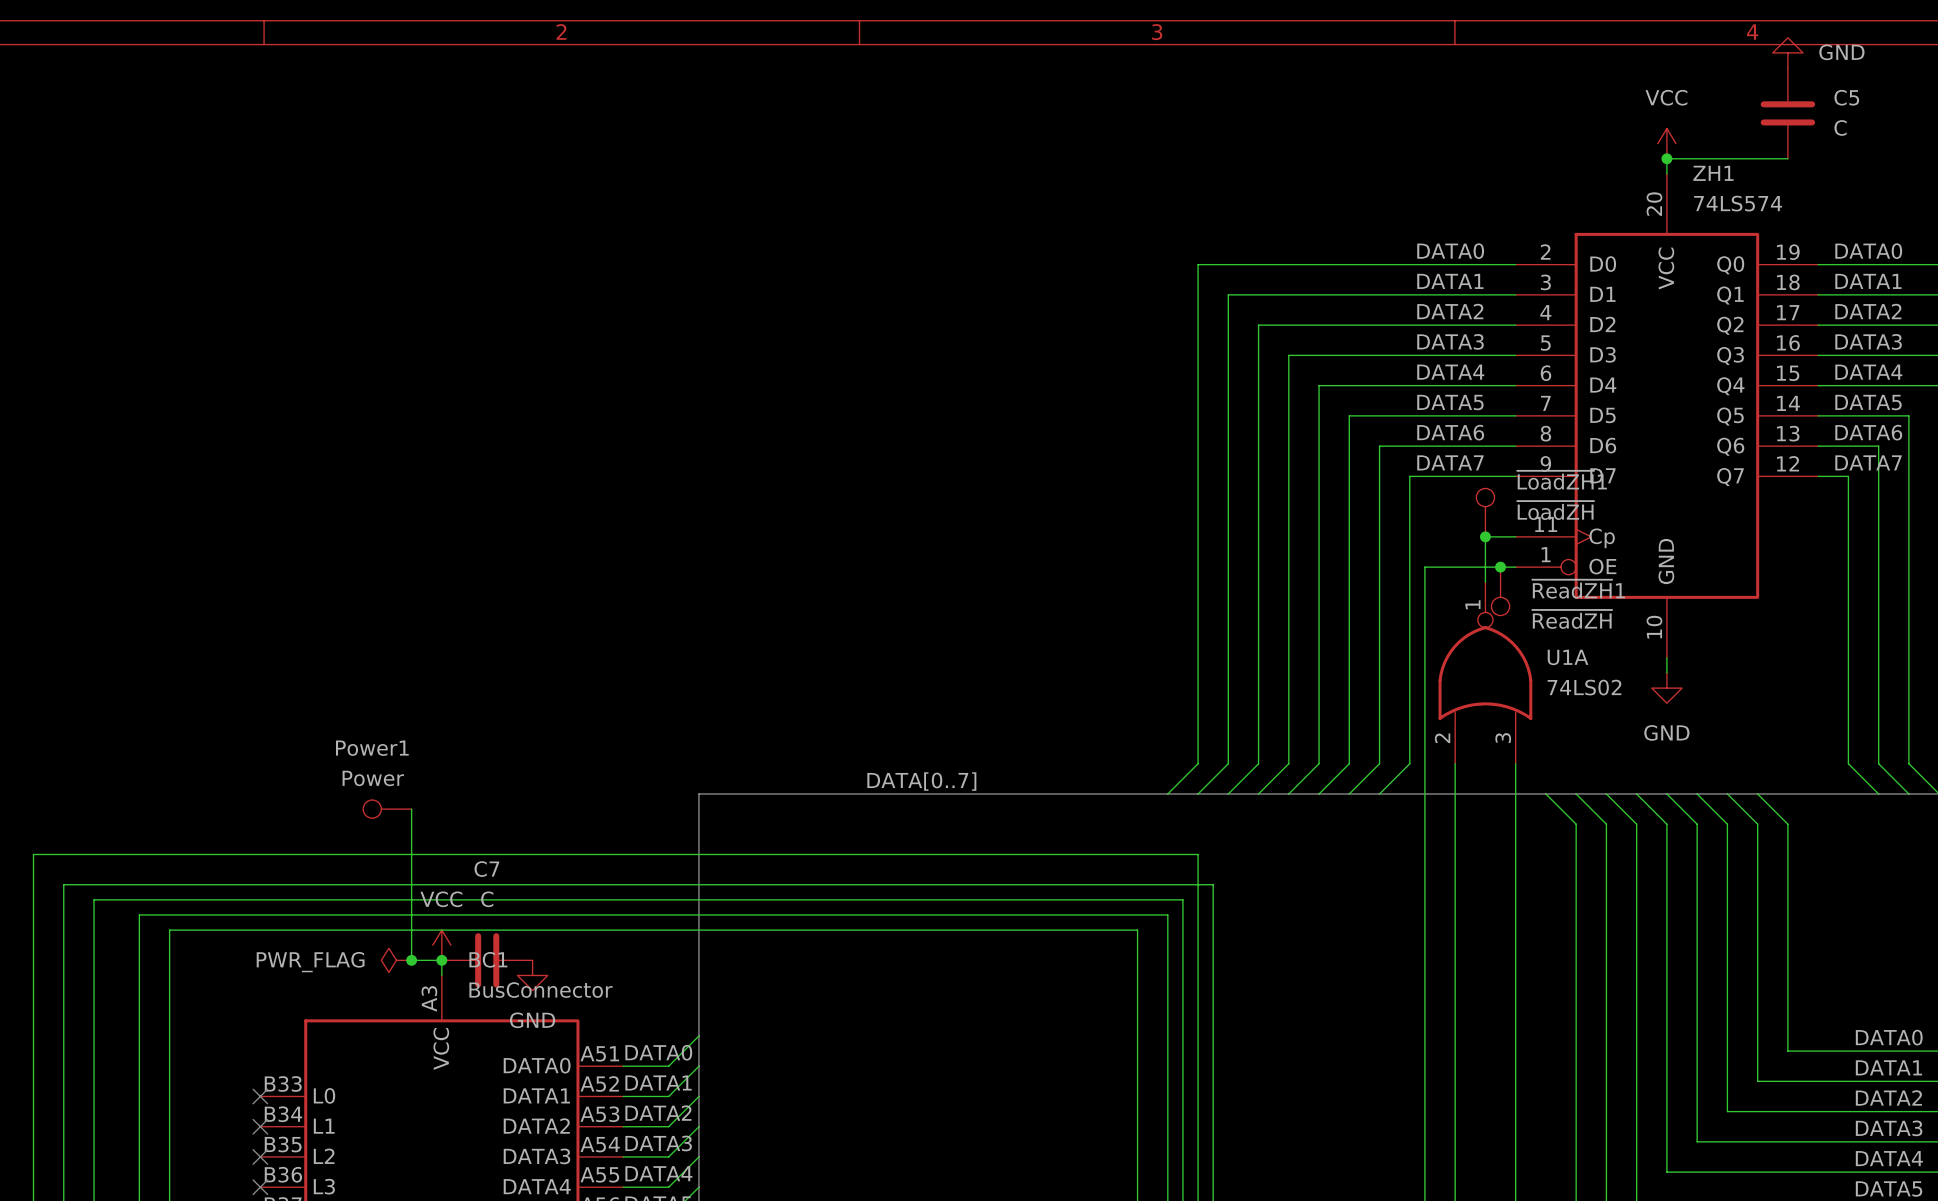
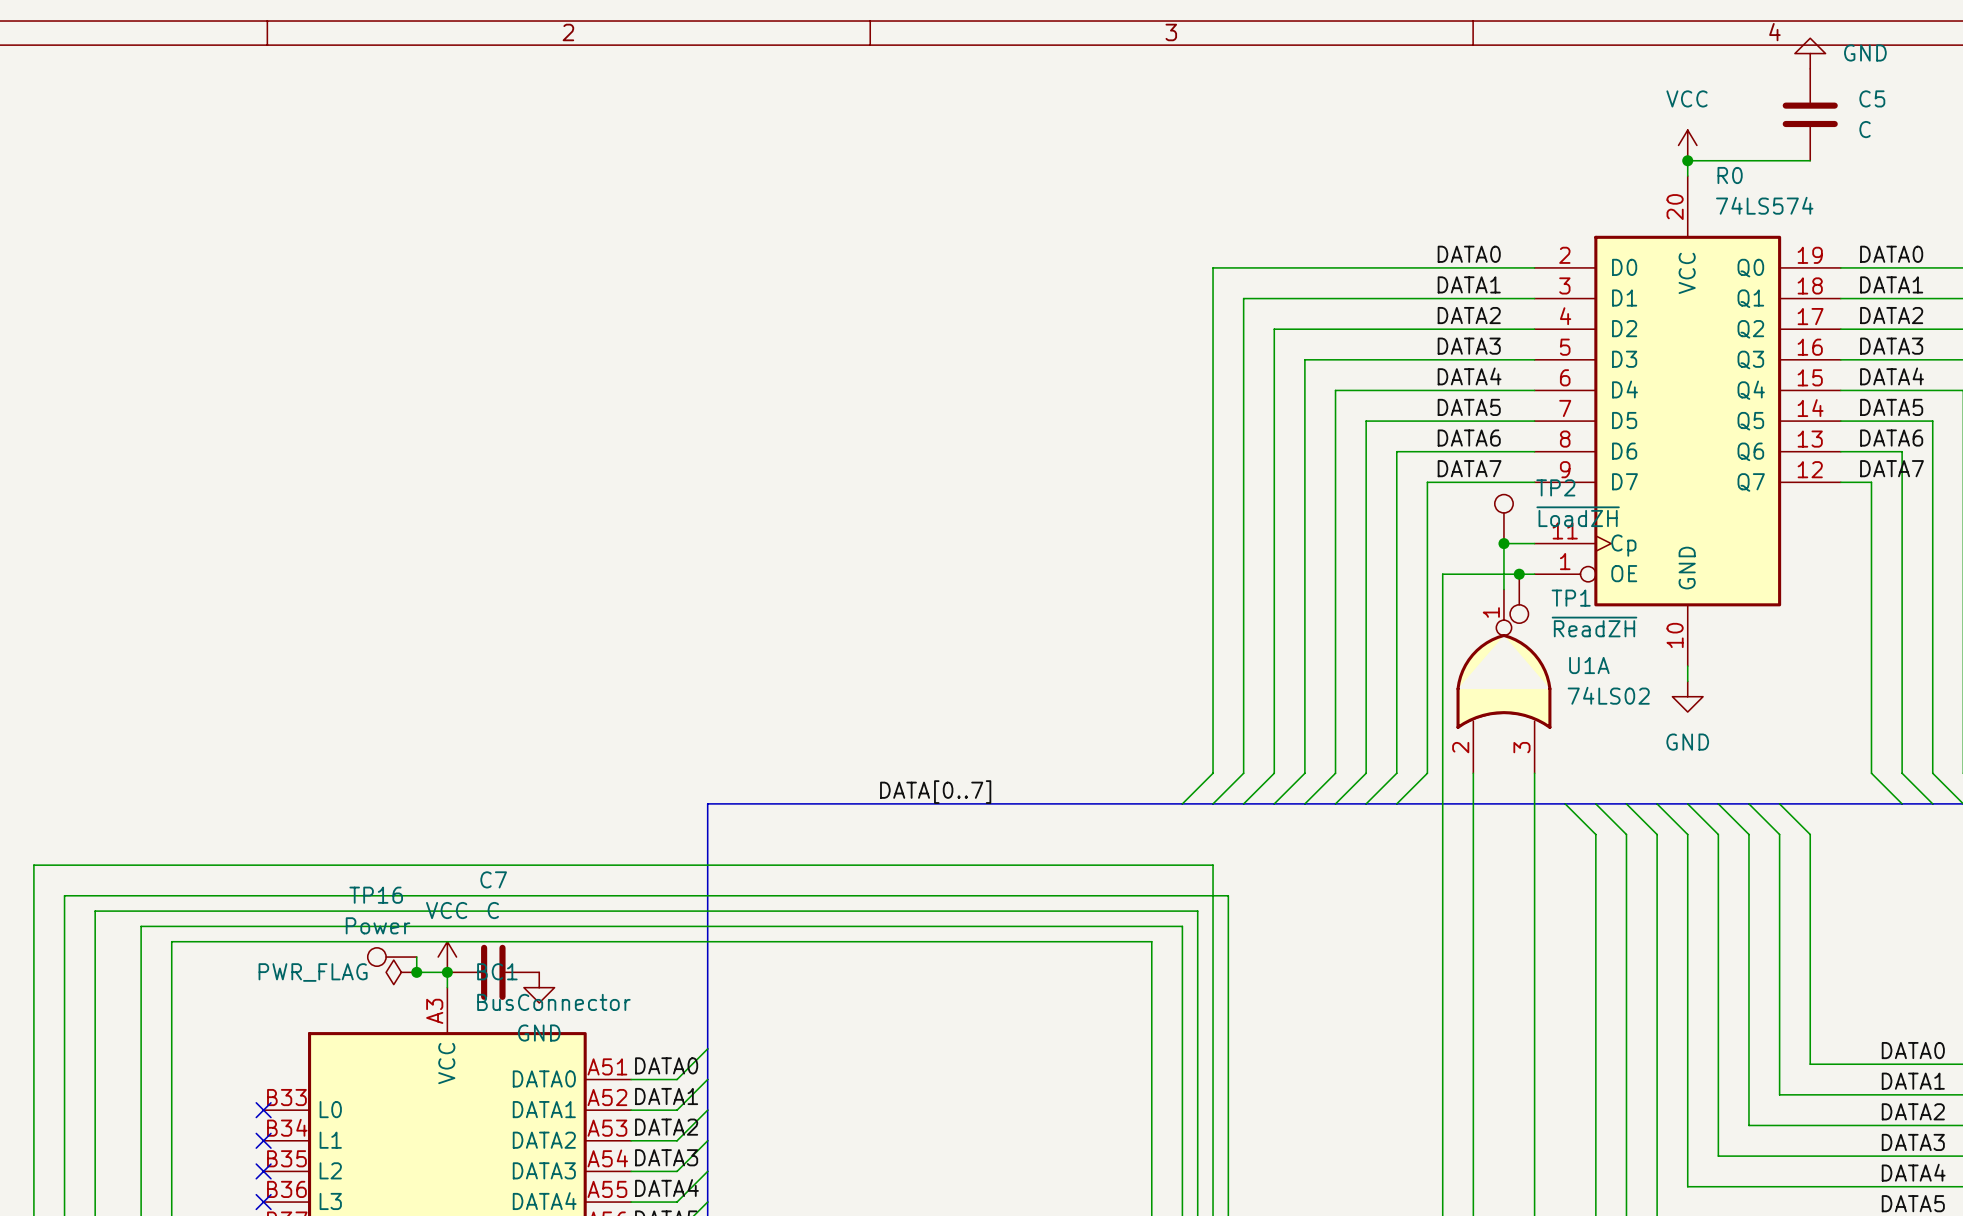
ZH1 name: ZH1 (1713, 173) -> R0 (1730, 175)
~{LoadZH}1 name: ~{LoadZH}1 (1562, 480) -> TP2 (1555, 487)
~{ReadZH}1 name: ~{ReadZH}1 (1578, 589) -> TP1 (1571, 598)
Power1: Power (387, 809) -> none
wire: (411, 809) (411, 945) -> none
TP16: none -> Power (392, 957)

